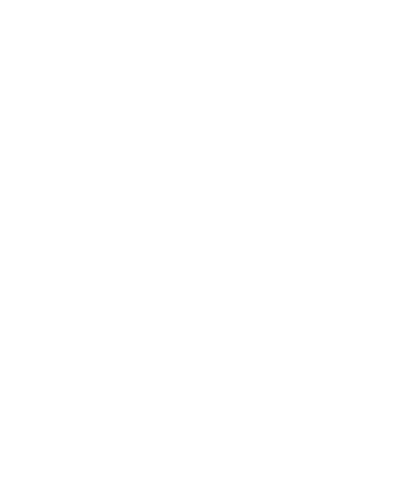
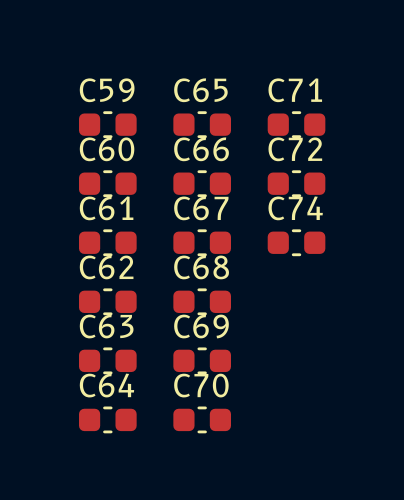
C59: none -> (107, 124)
C65: none -> (202, 124)
C71: none -> (296, 124)
C60: none -> (107, 183)
C66: none -> (202, 183)
C72: none -> (296, 183)
C61: none -> (107, 242)
C67: none -> (202, 242)
C74: none -> (296, 242)
C62: none -> (107, 301)
C68: none -> (202, 301)
C63: none -> (107, 360)
C69: none -> (202, 360)
C64: none -> (107, 419)
C70: none -> (202, 419)

